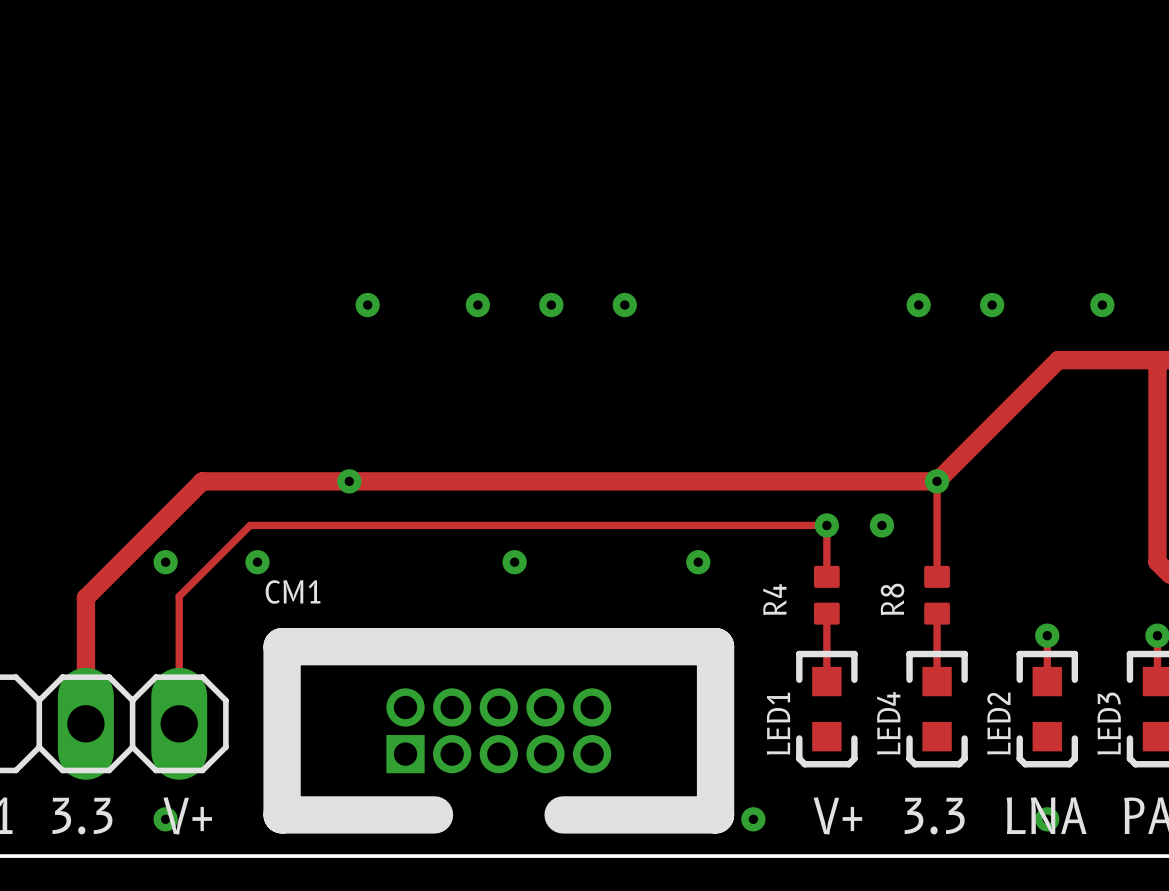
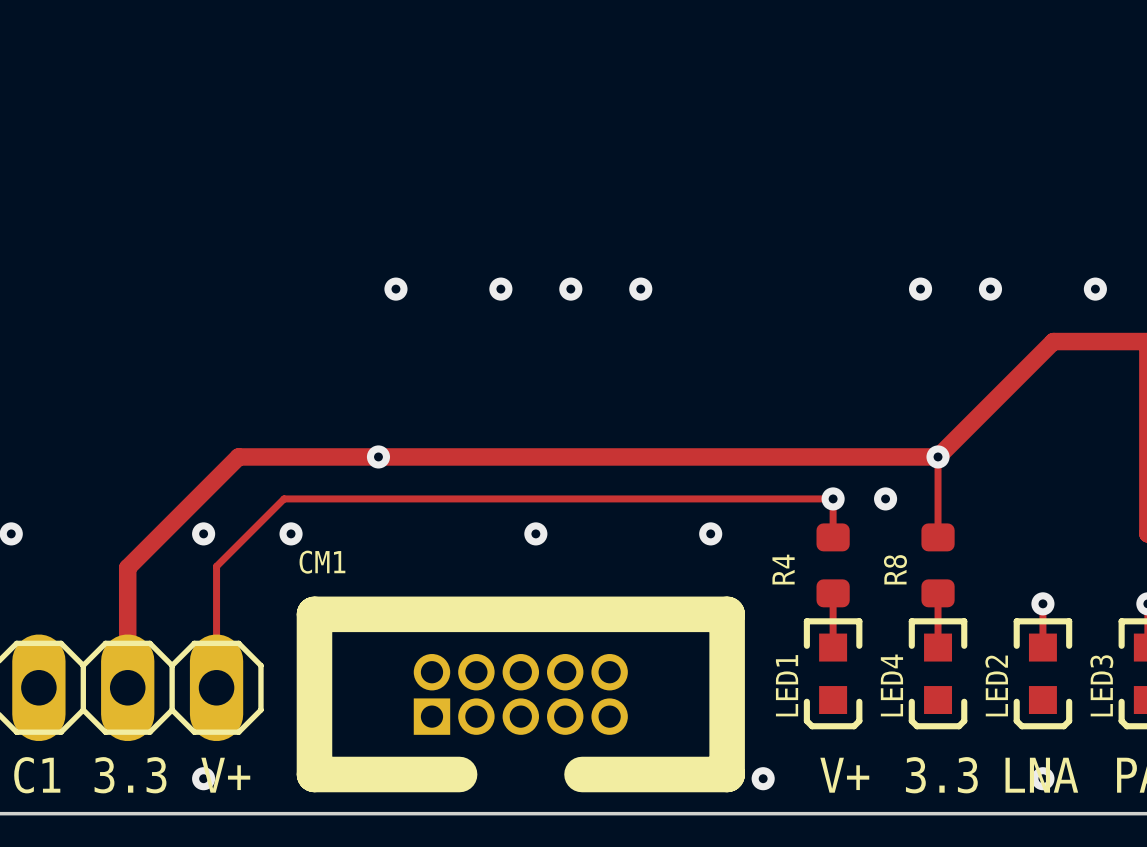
R4 footprint: [814, 565, 840, 625] -> [816, 523, 850, 608]
R8 footprint: [924, 565, 950, 625] -> [921, 523, 955, 608]

